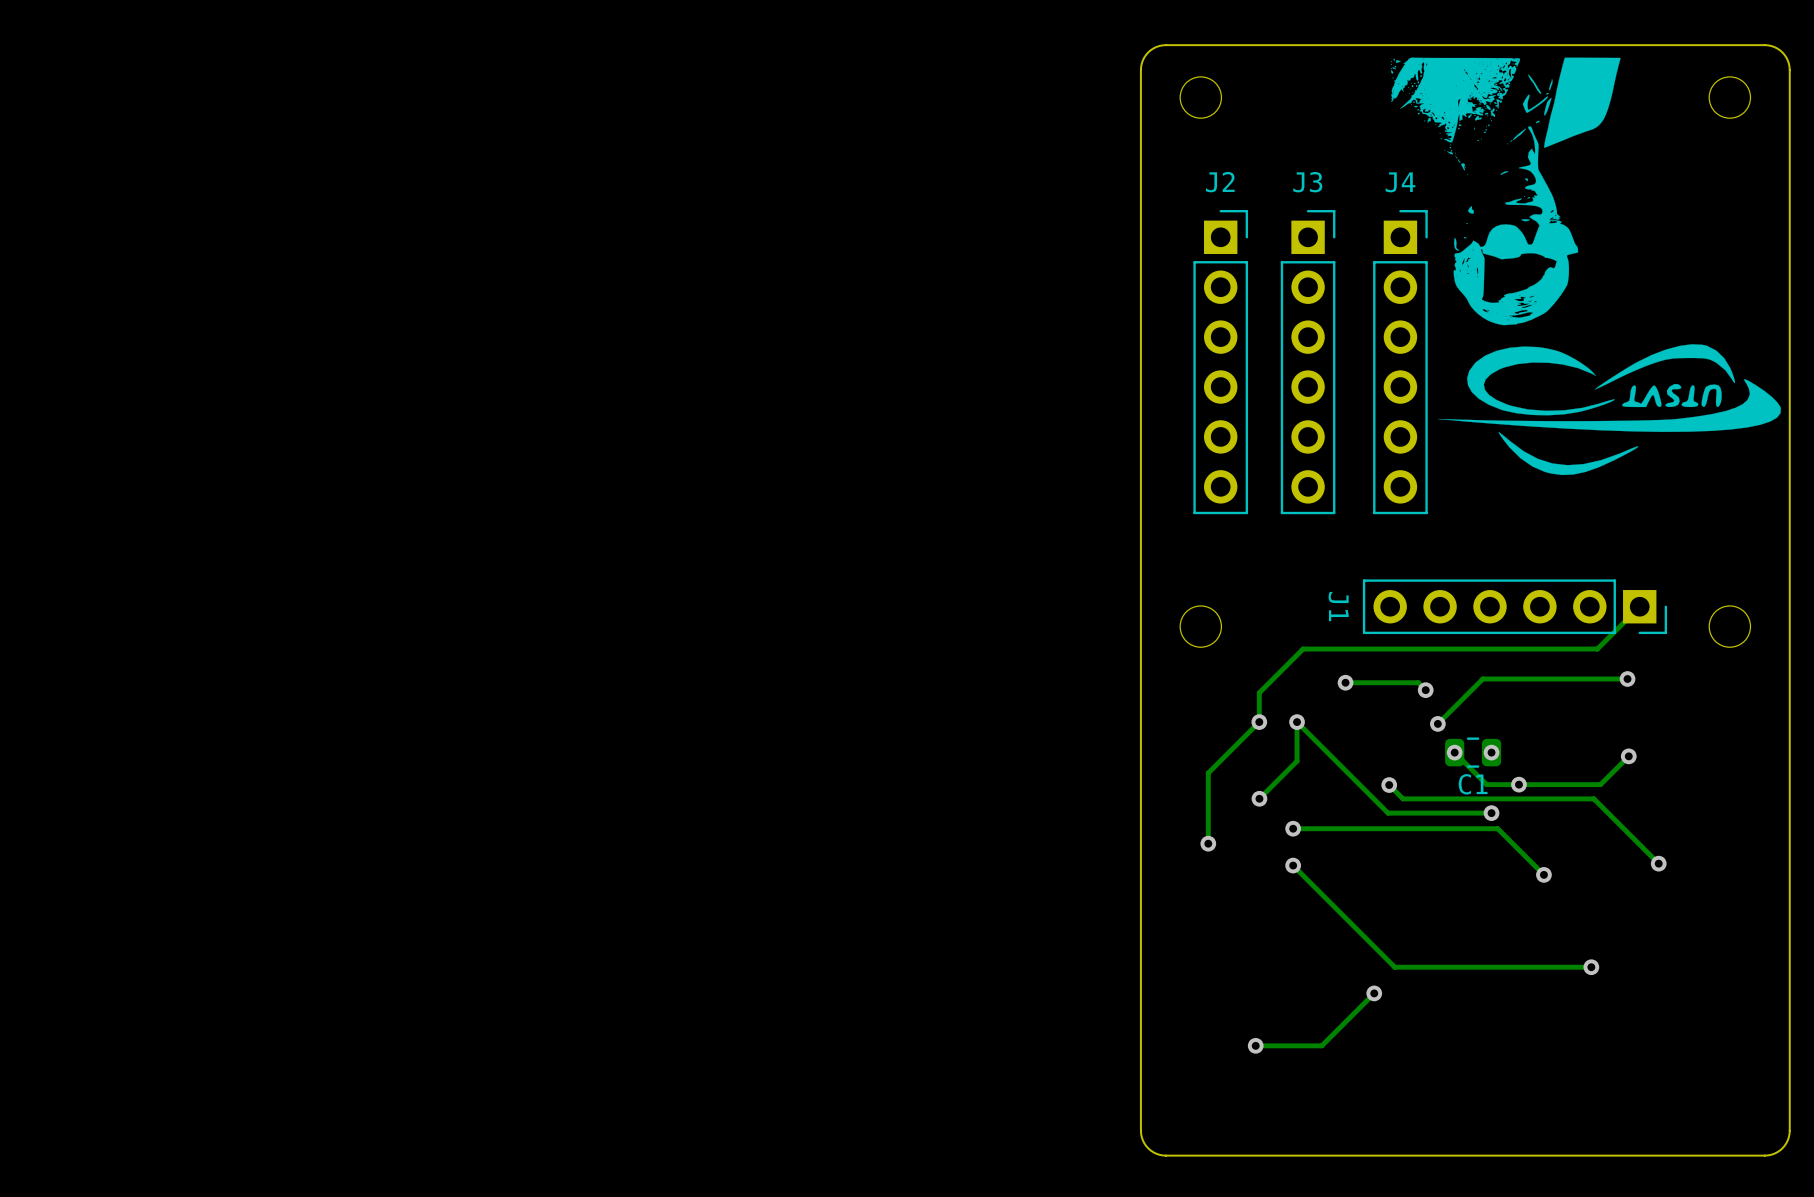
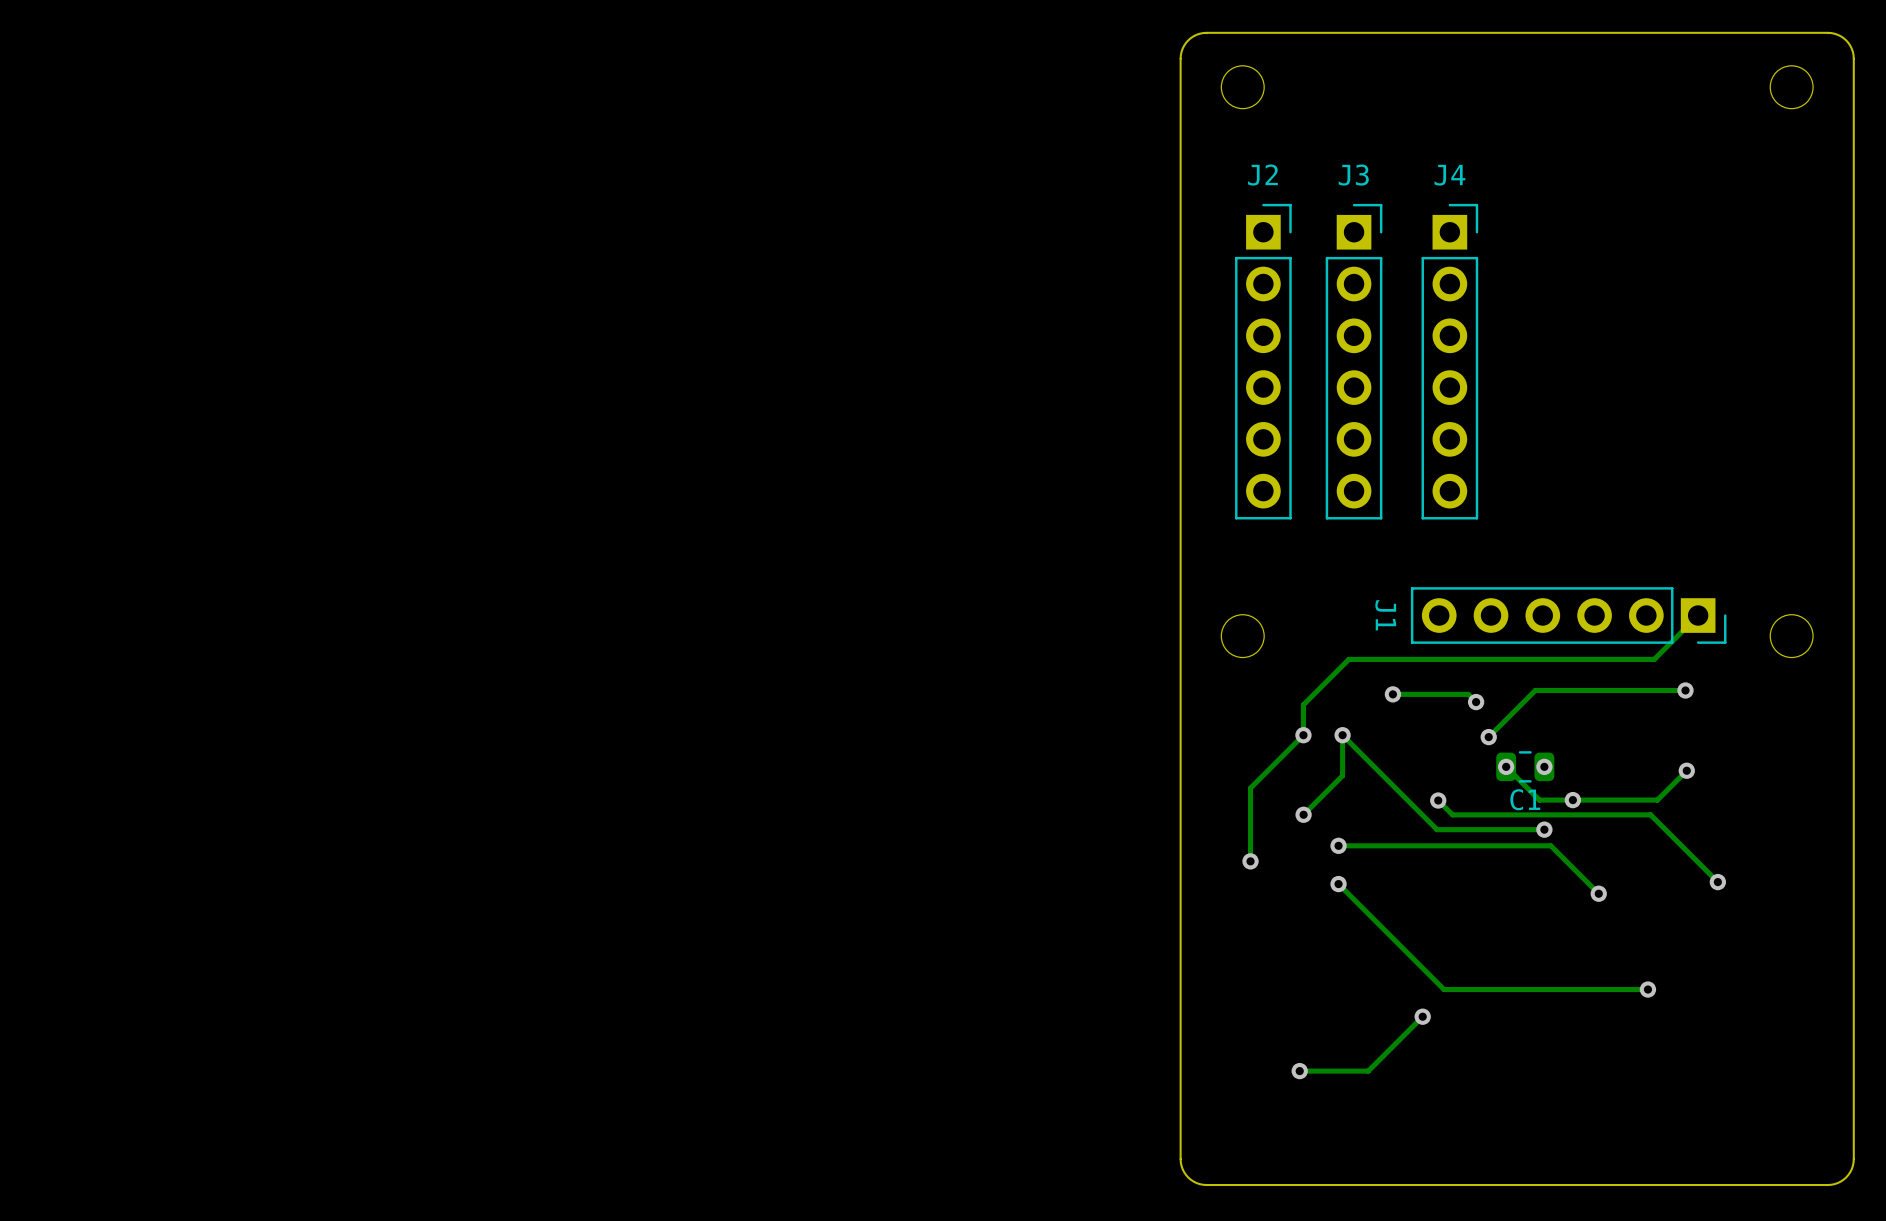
drawing: [1391, 57, 1781, 476] -> none

